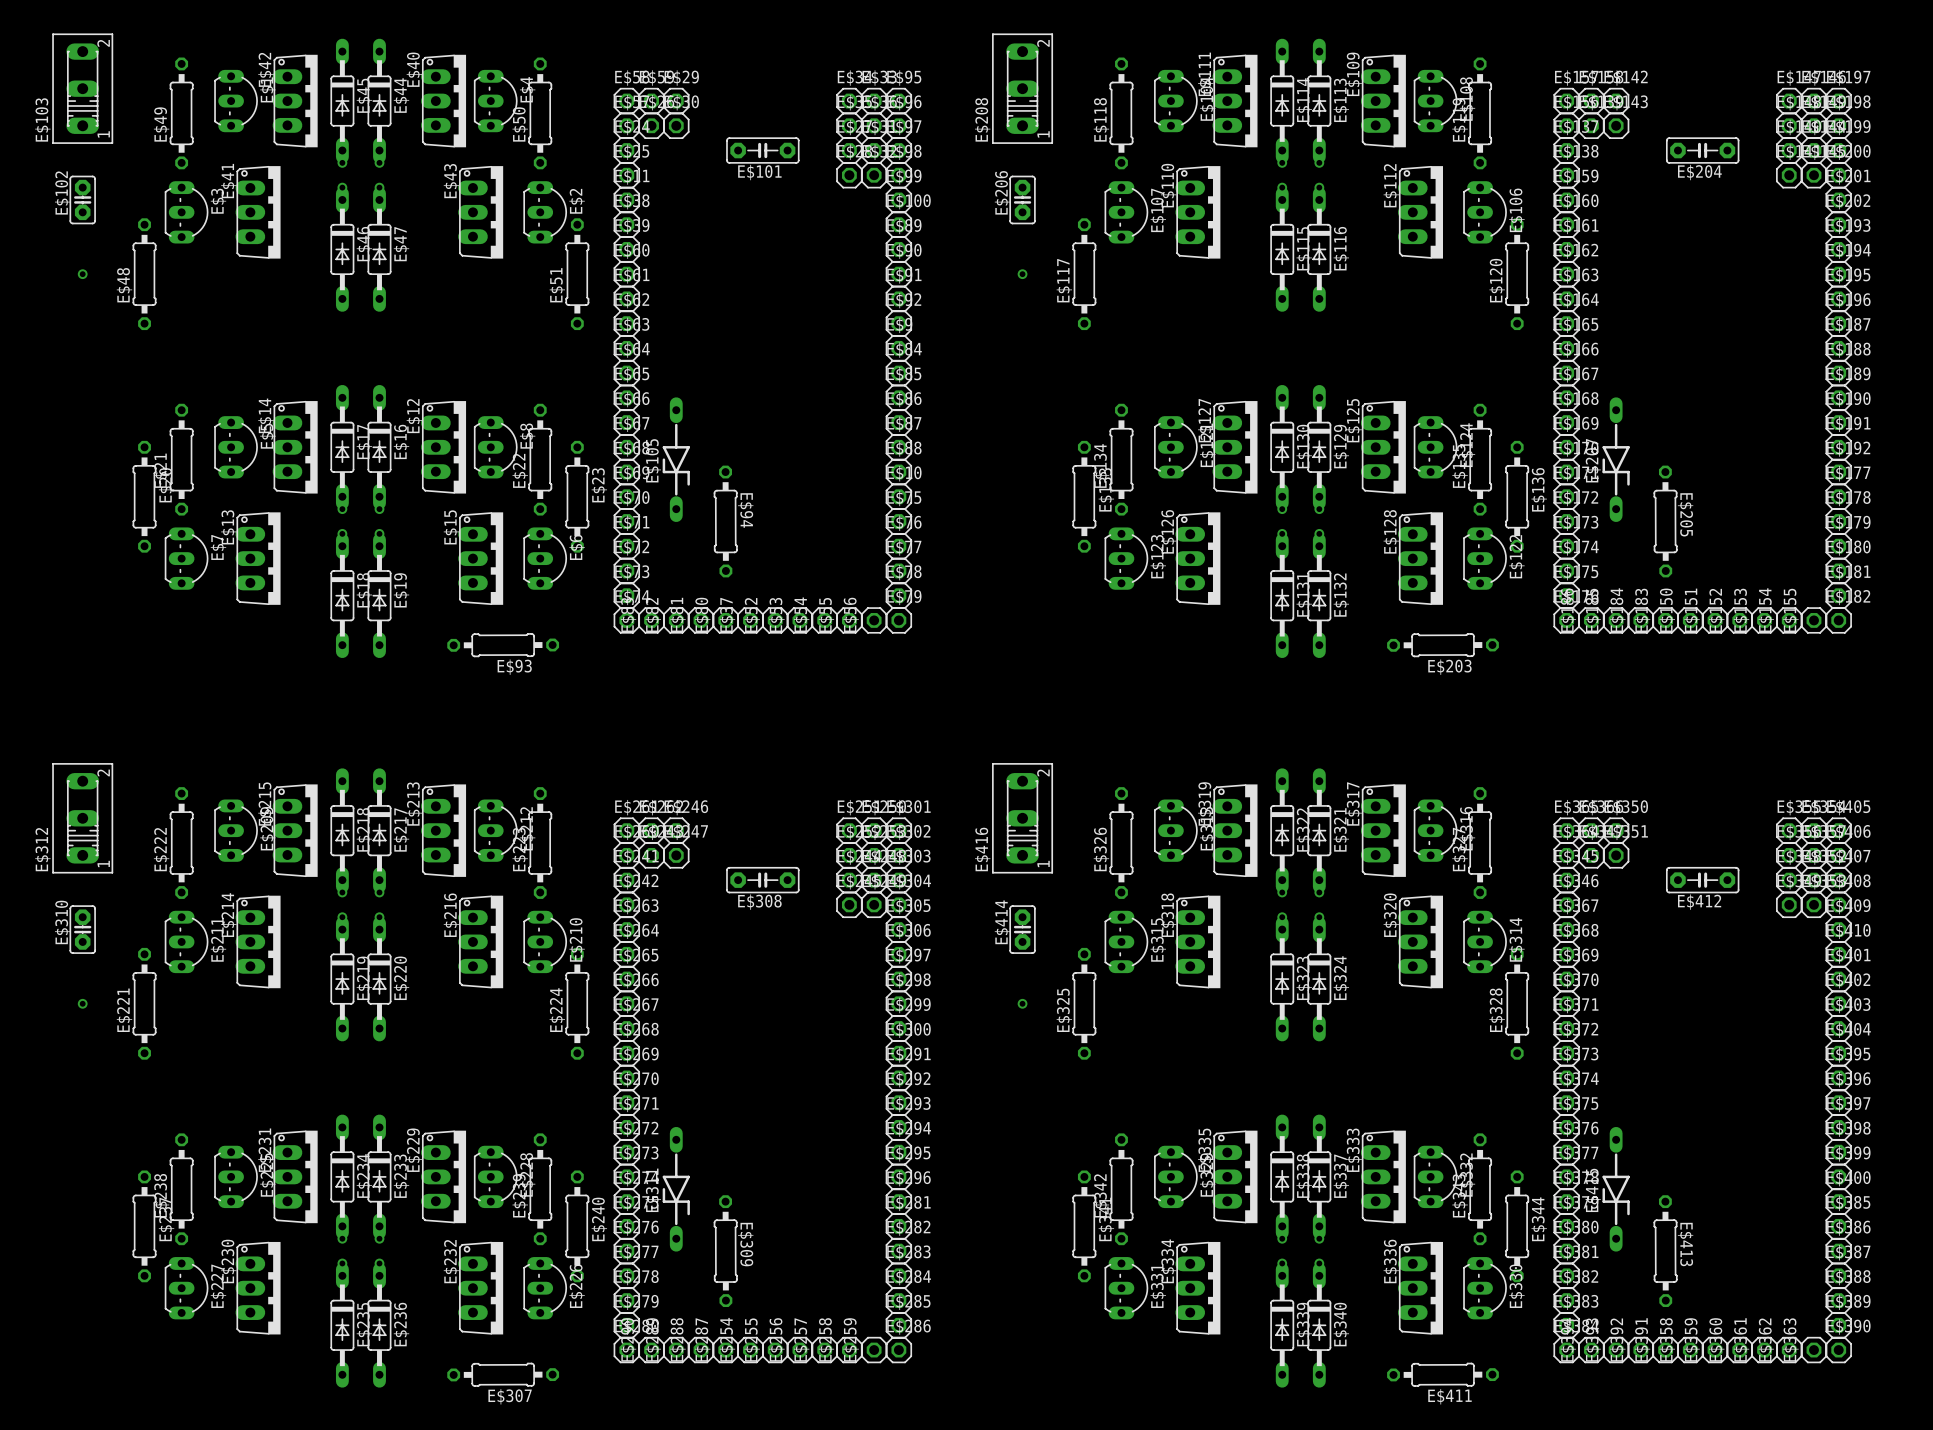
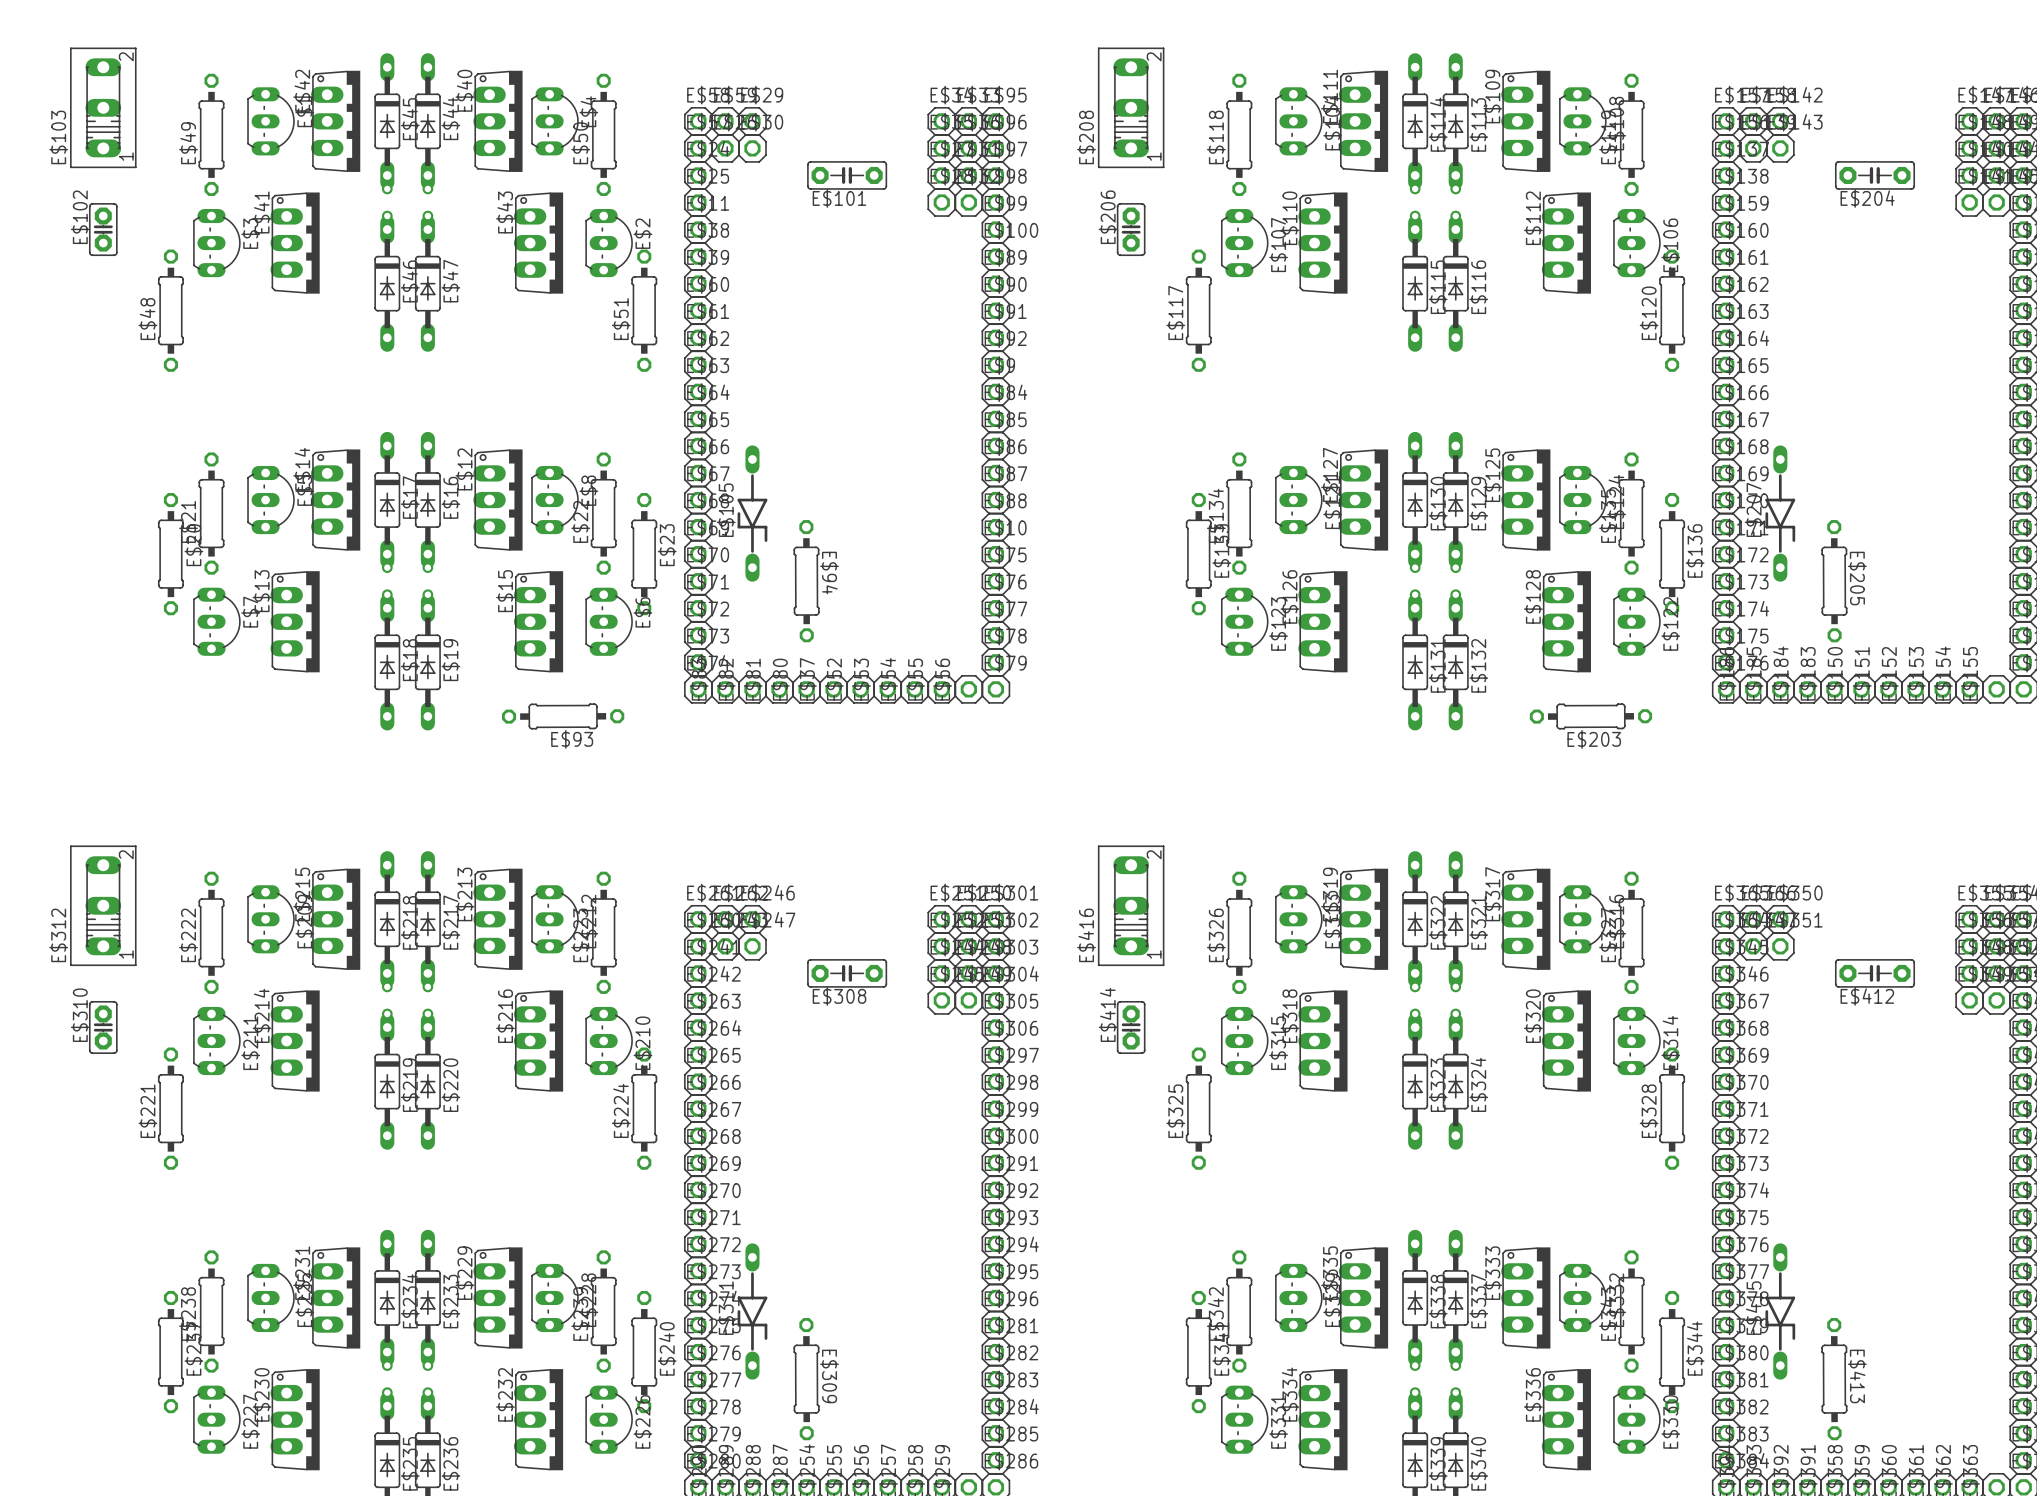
via: (82, 274) -> none
via: (1022, 274) -> none
via: (82, 1003) -> none
via: (1022, 1003) -> none

